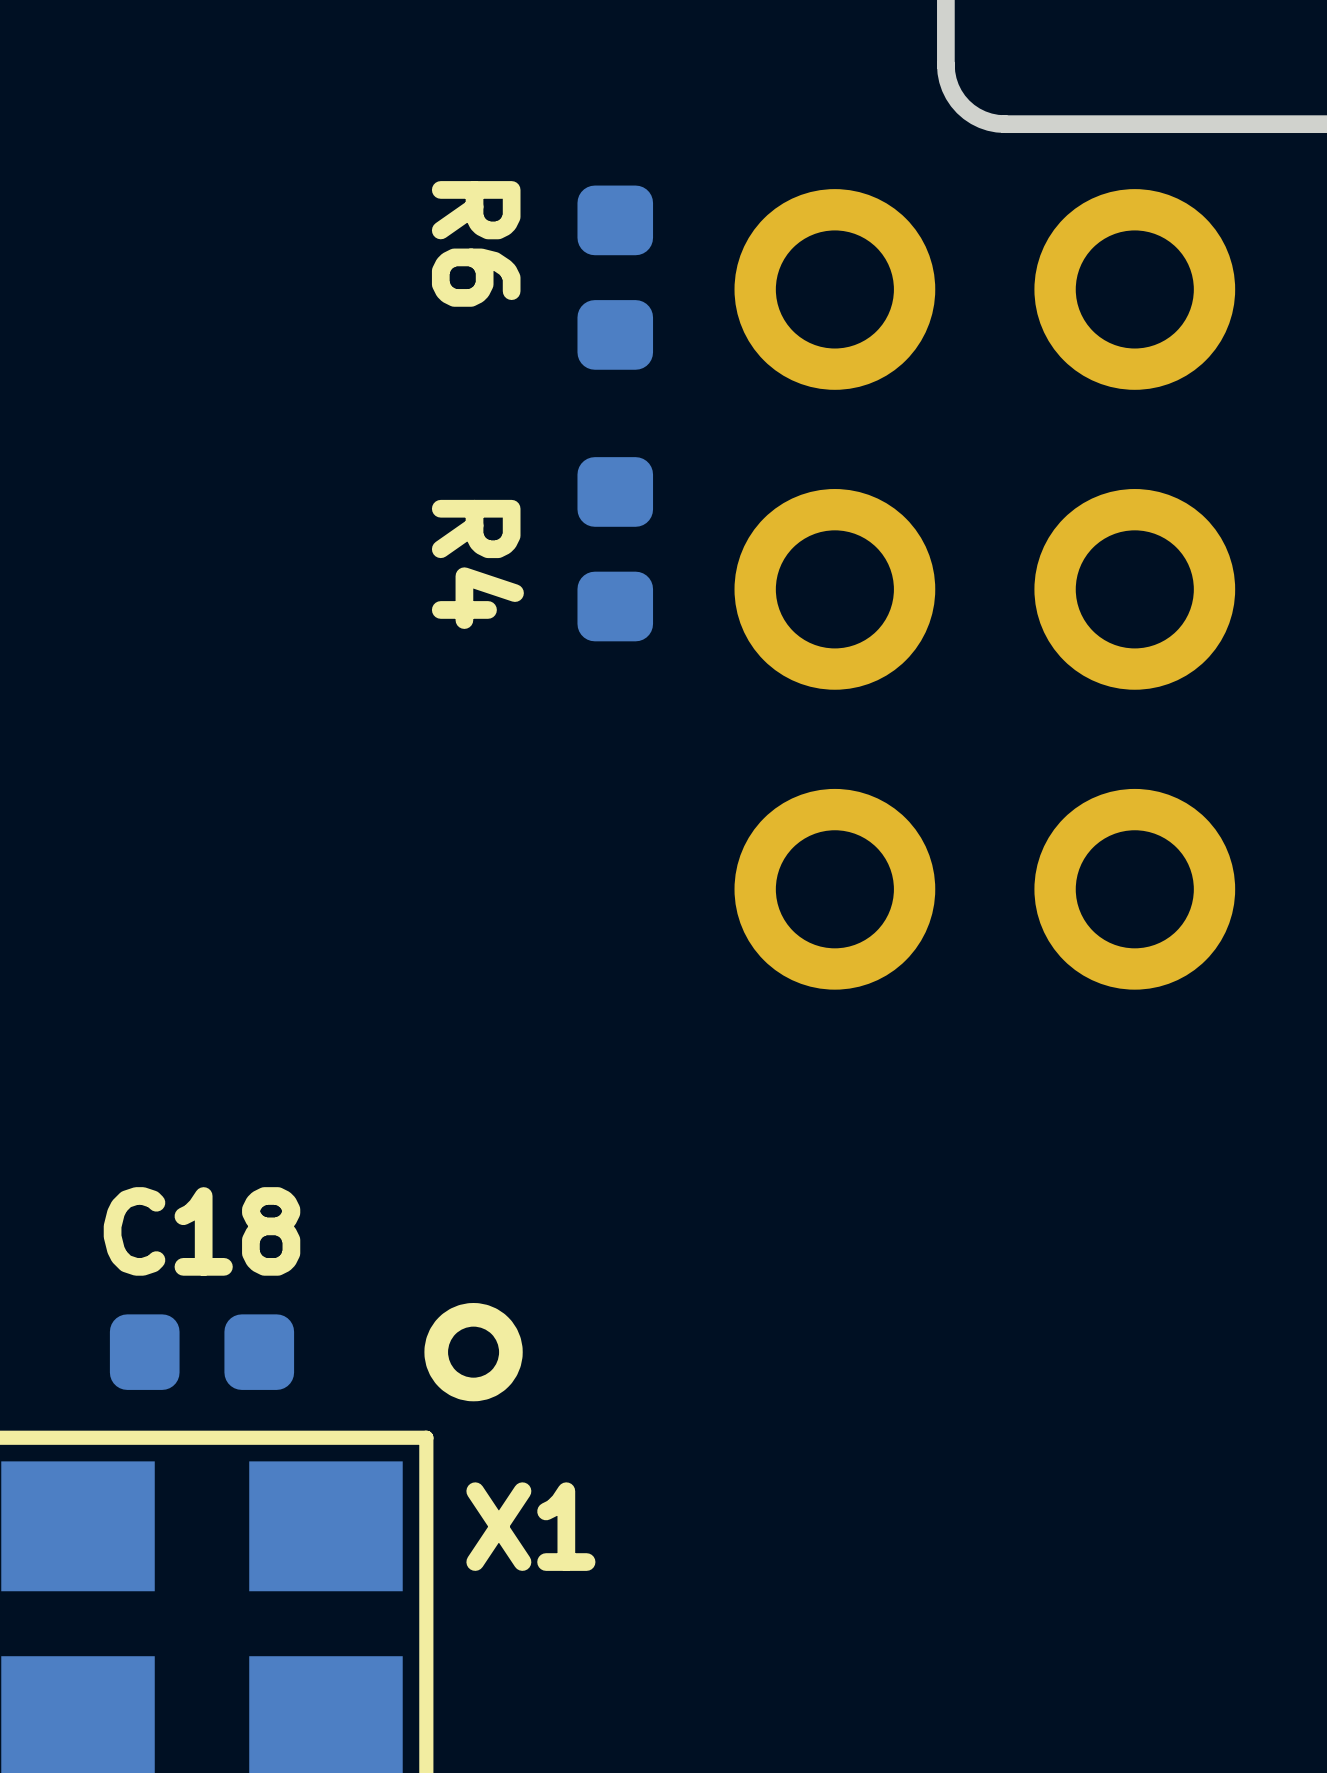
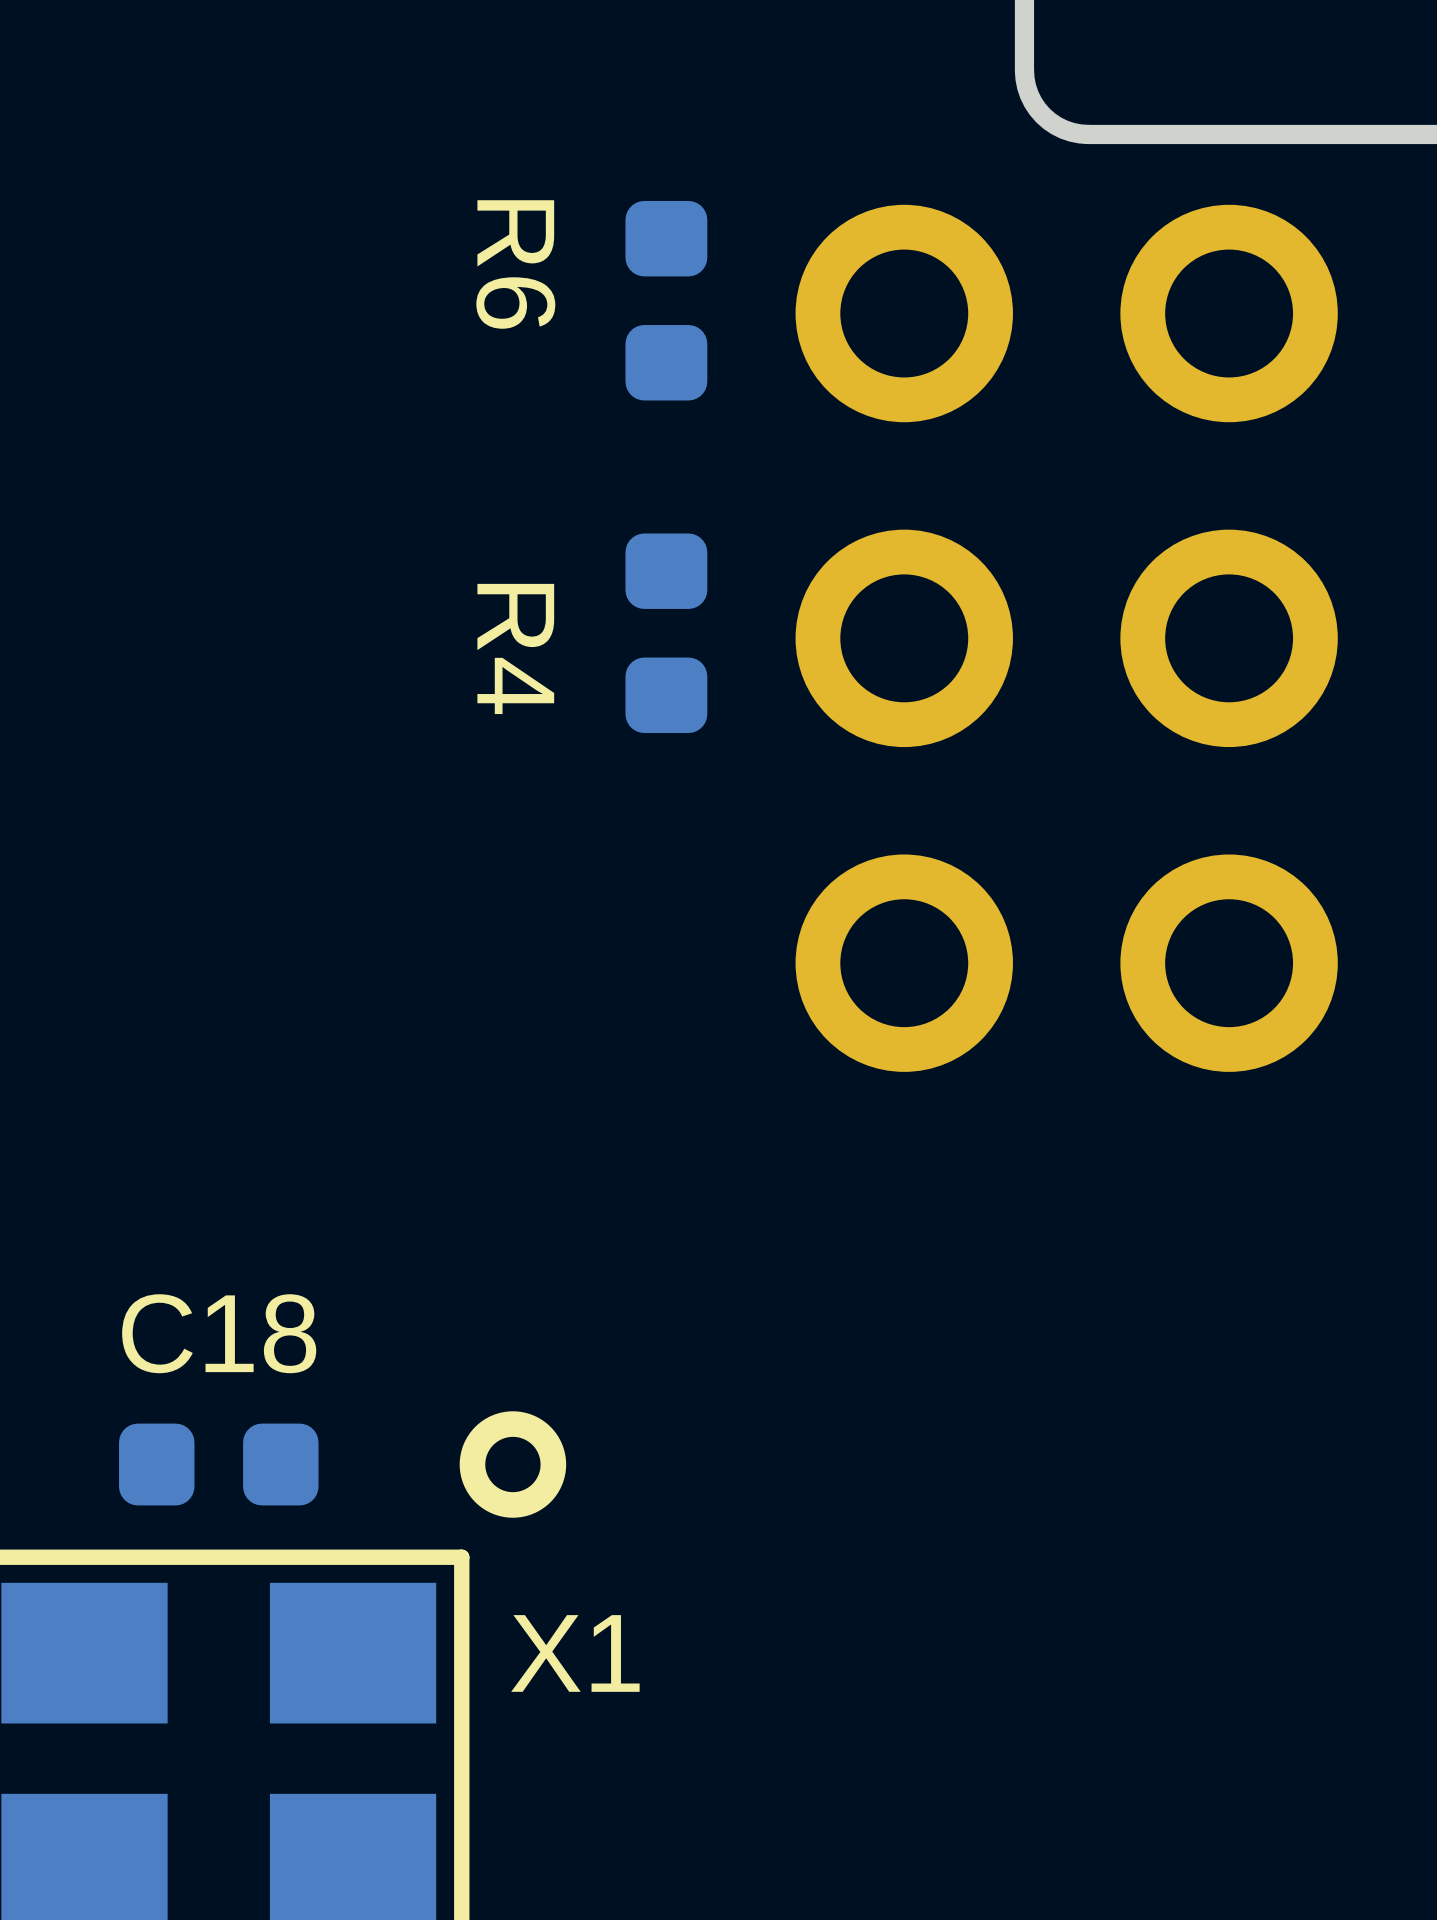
R4 position: (615, 549) -> (666, 633)

